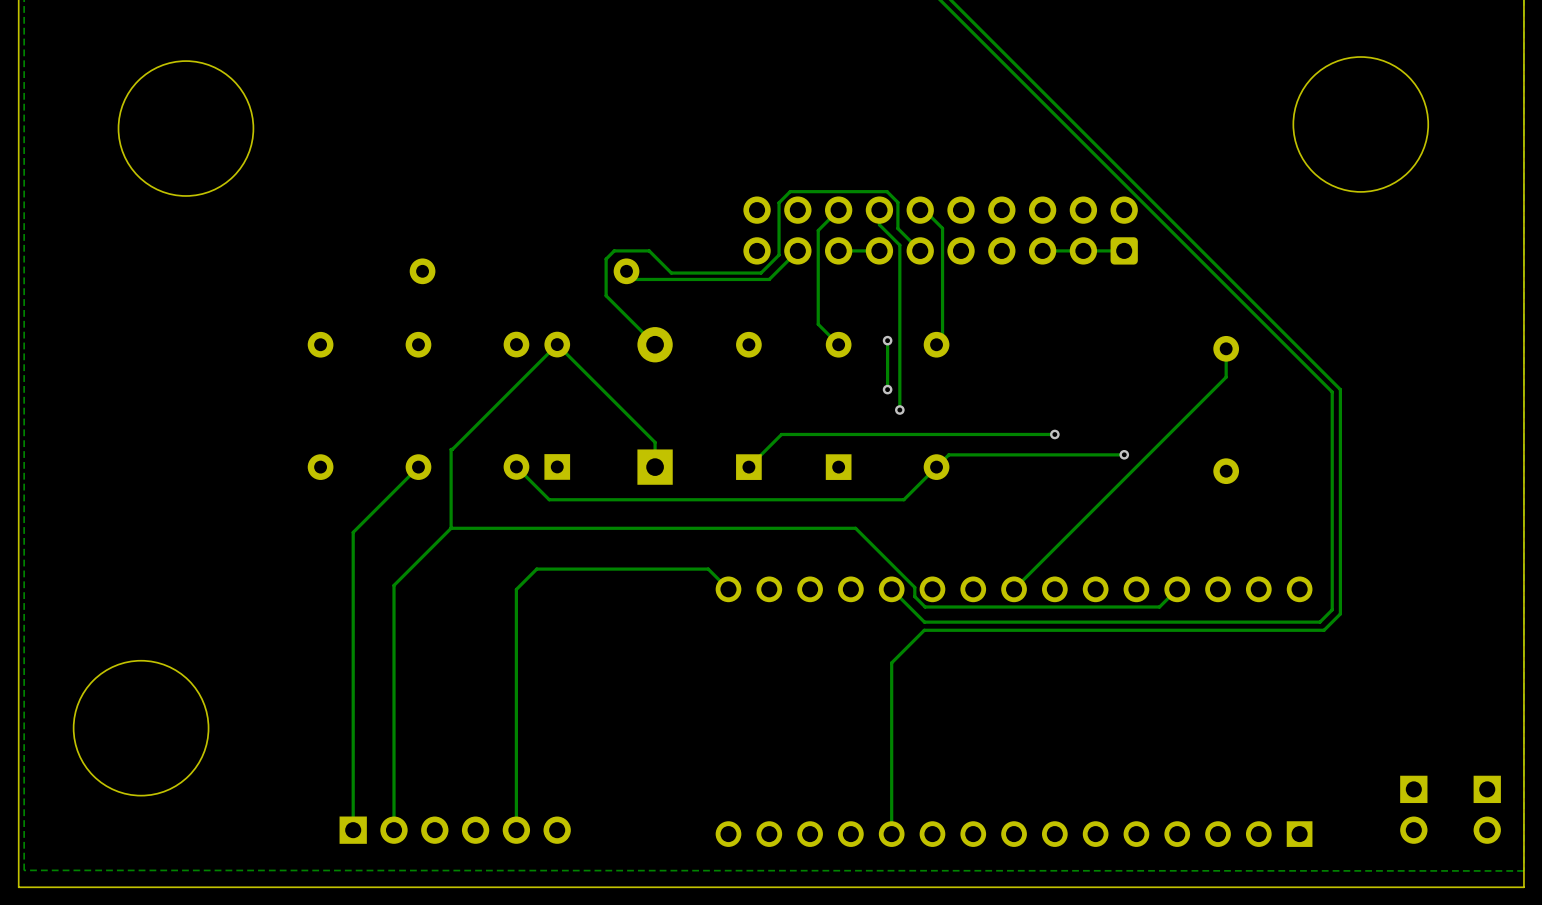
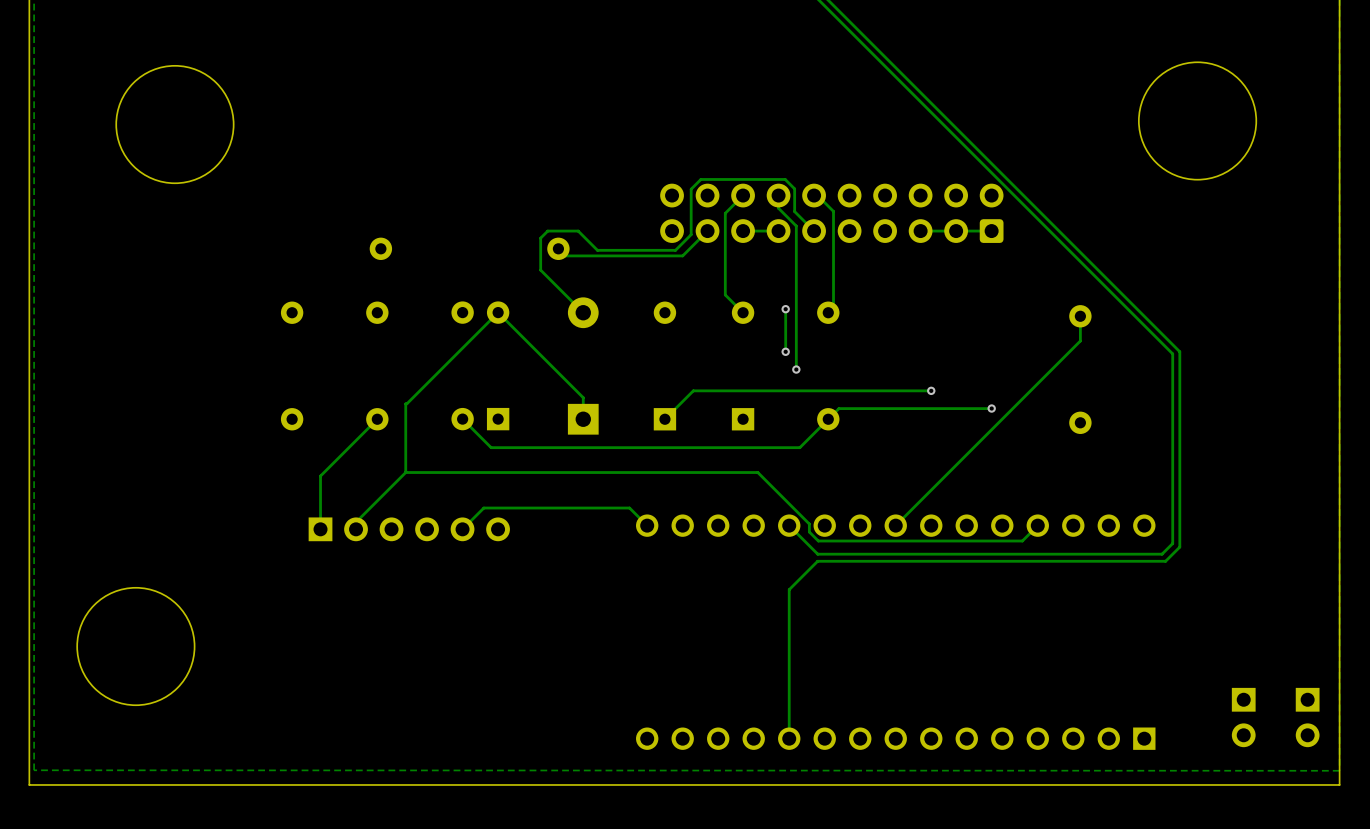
track: (540, 569) (536, 569) (516, 589) (516, 830) -> (483, 508) (462, 529)
track: (353, 593) (353, 830) -> none
track: (394, 593) (394, 830) -> none
part position: (455, 830) -> (409, 529)

